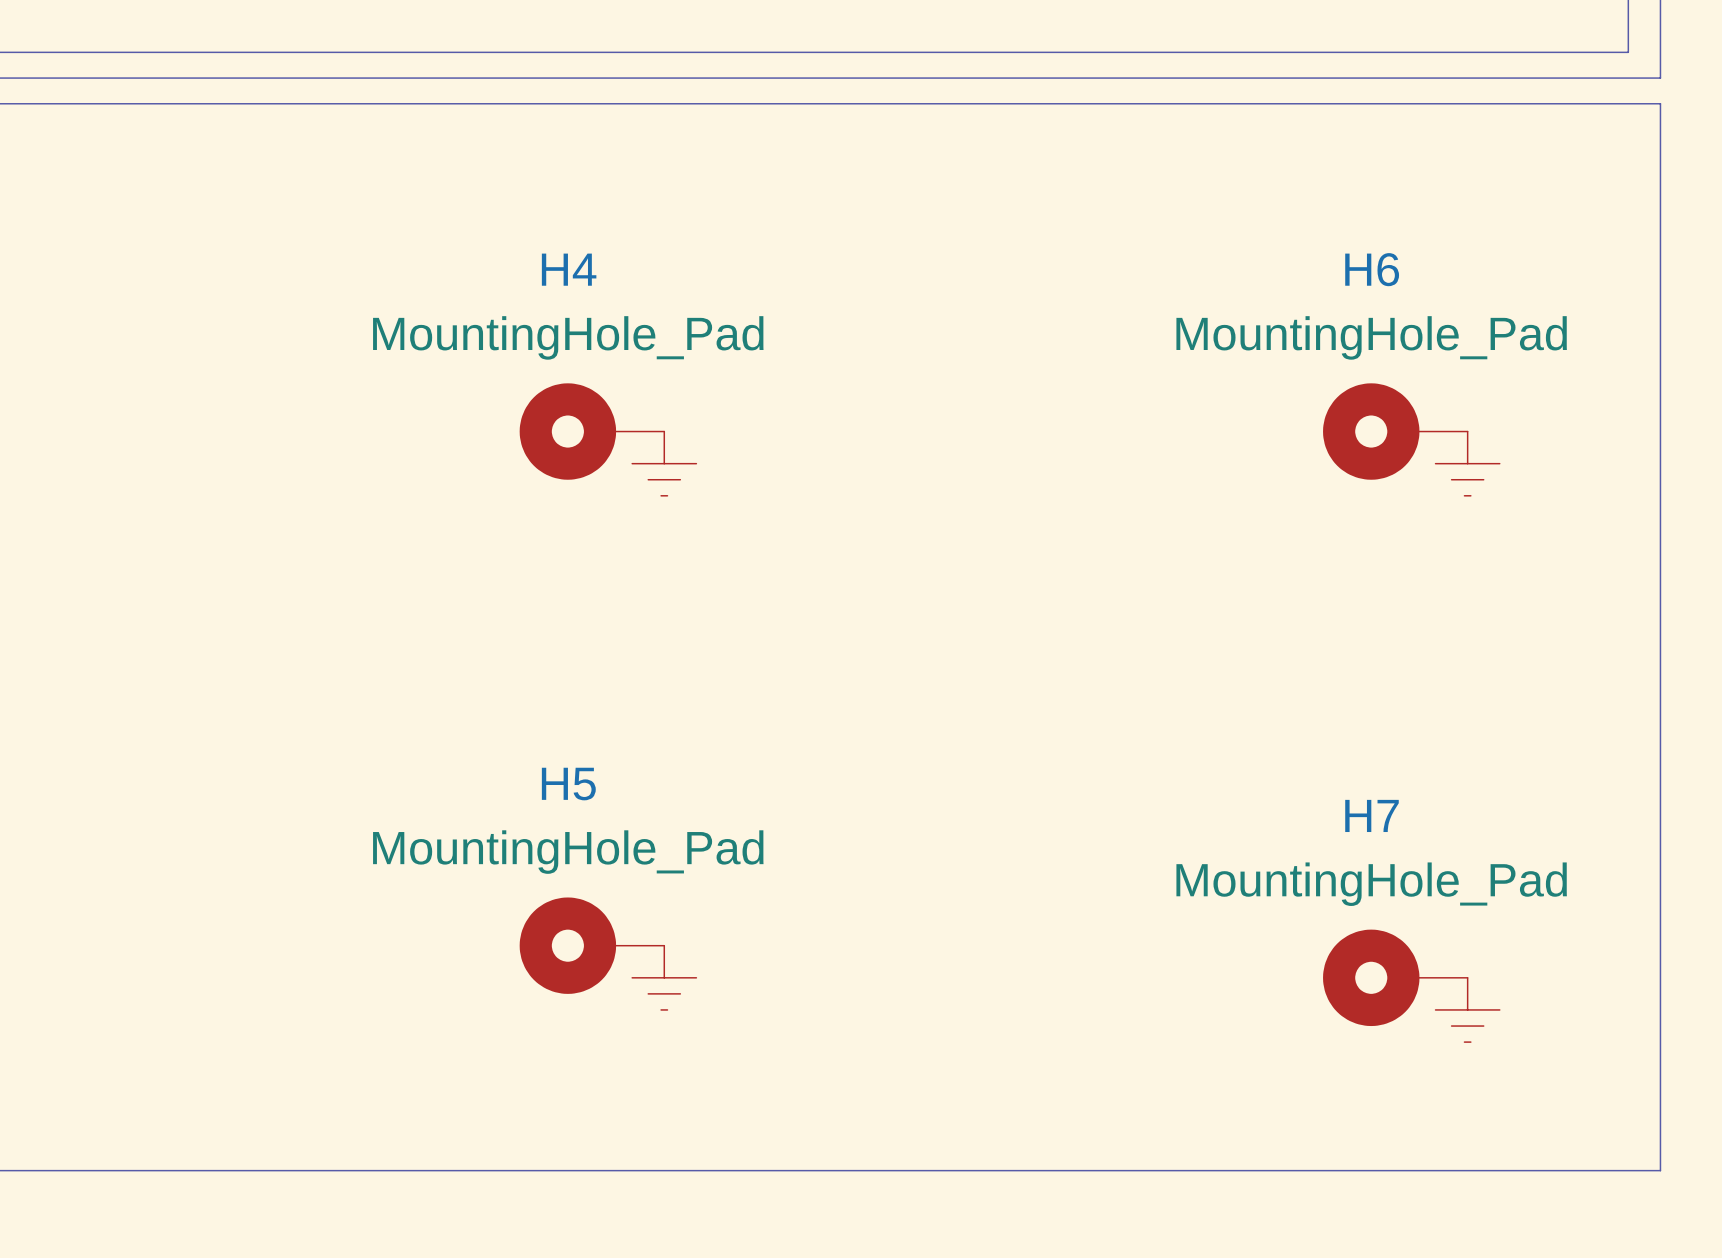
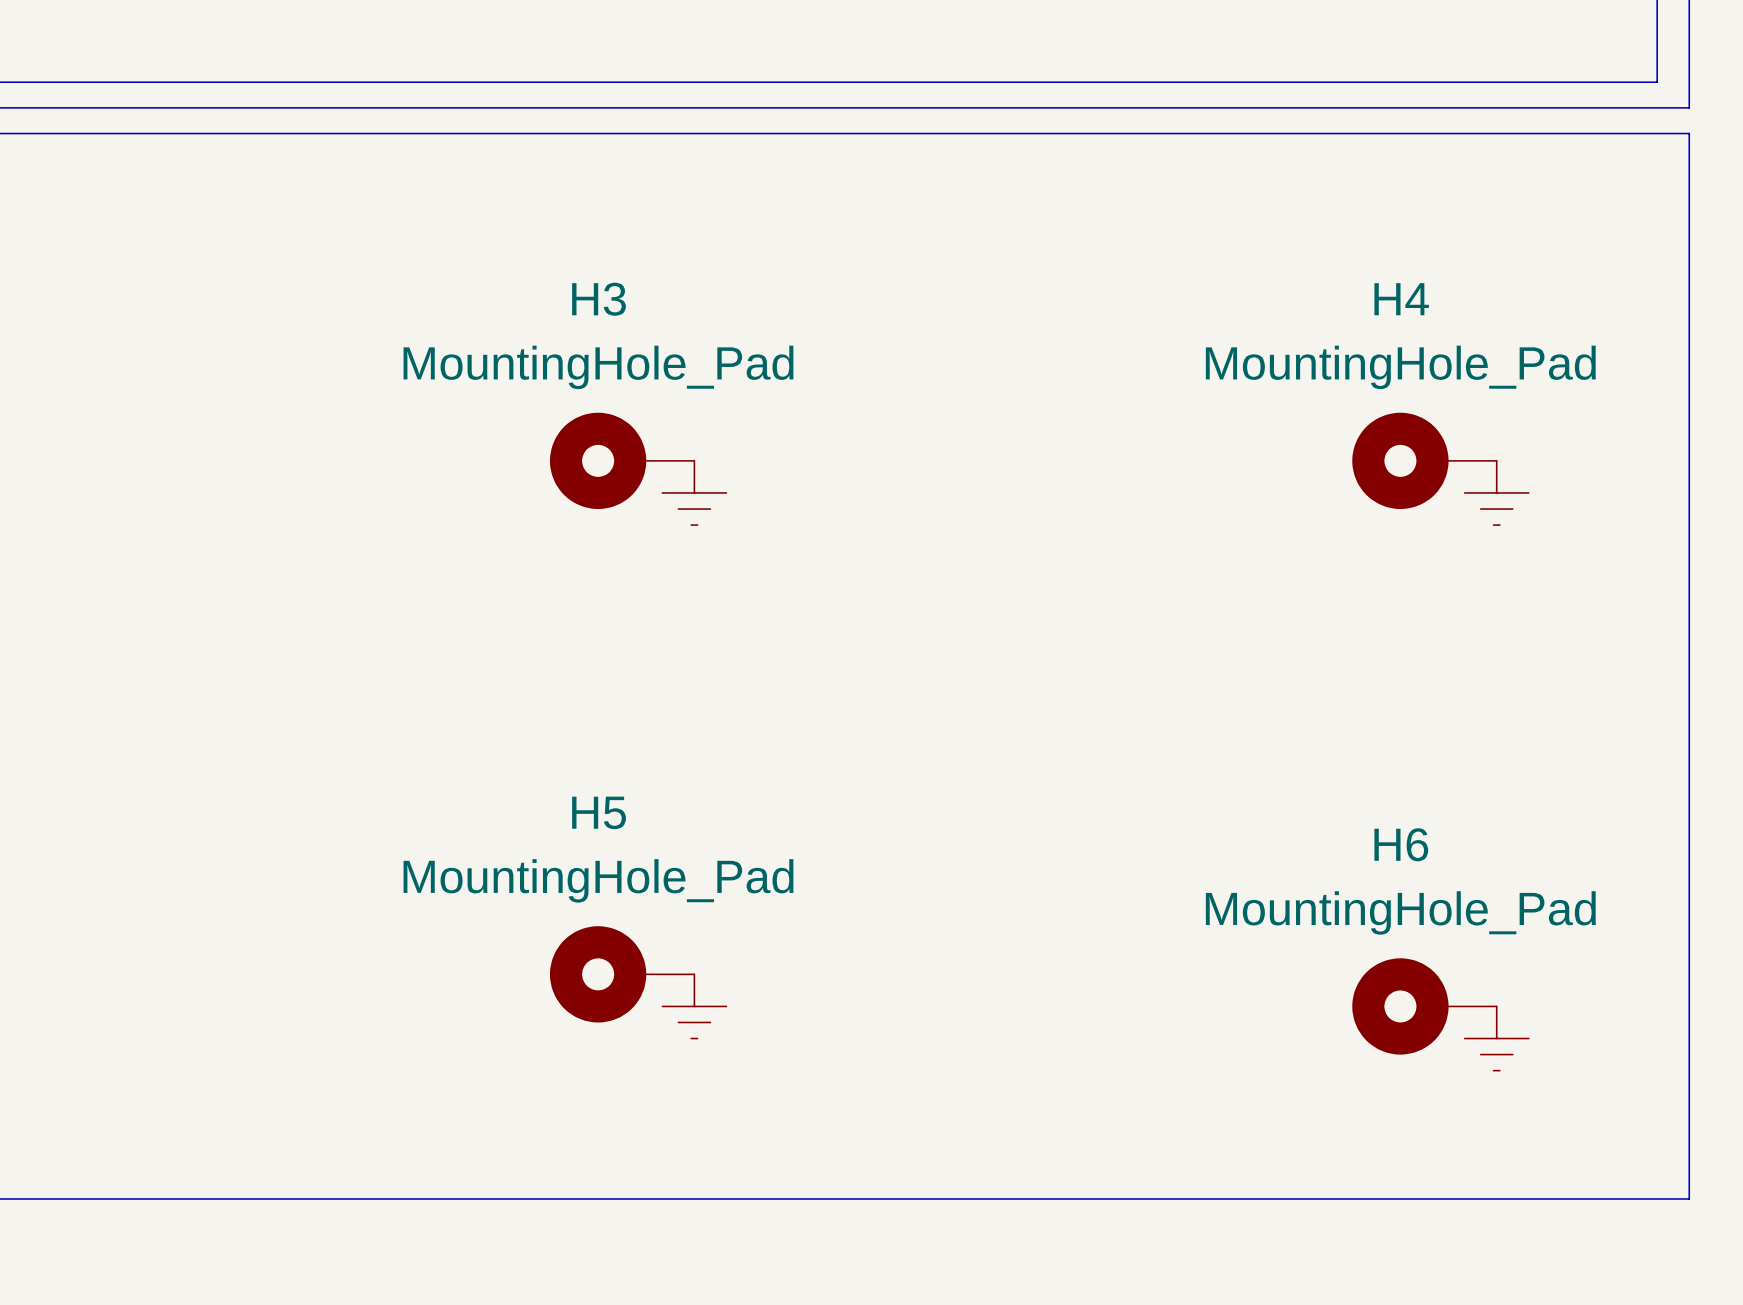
H4 name: H4 (569, 269) -> H3 (599, 299)
H6 name: H6 (1372, 269) -> H4 (1401, 299)
H7 name: H7 (1371, 815) -> H6 (1401, 844)

